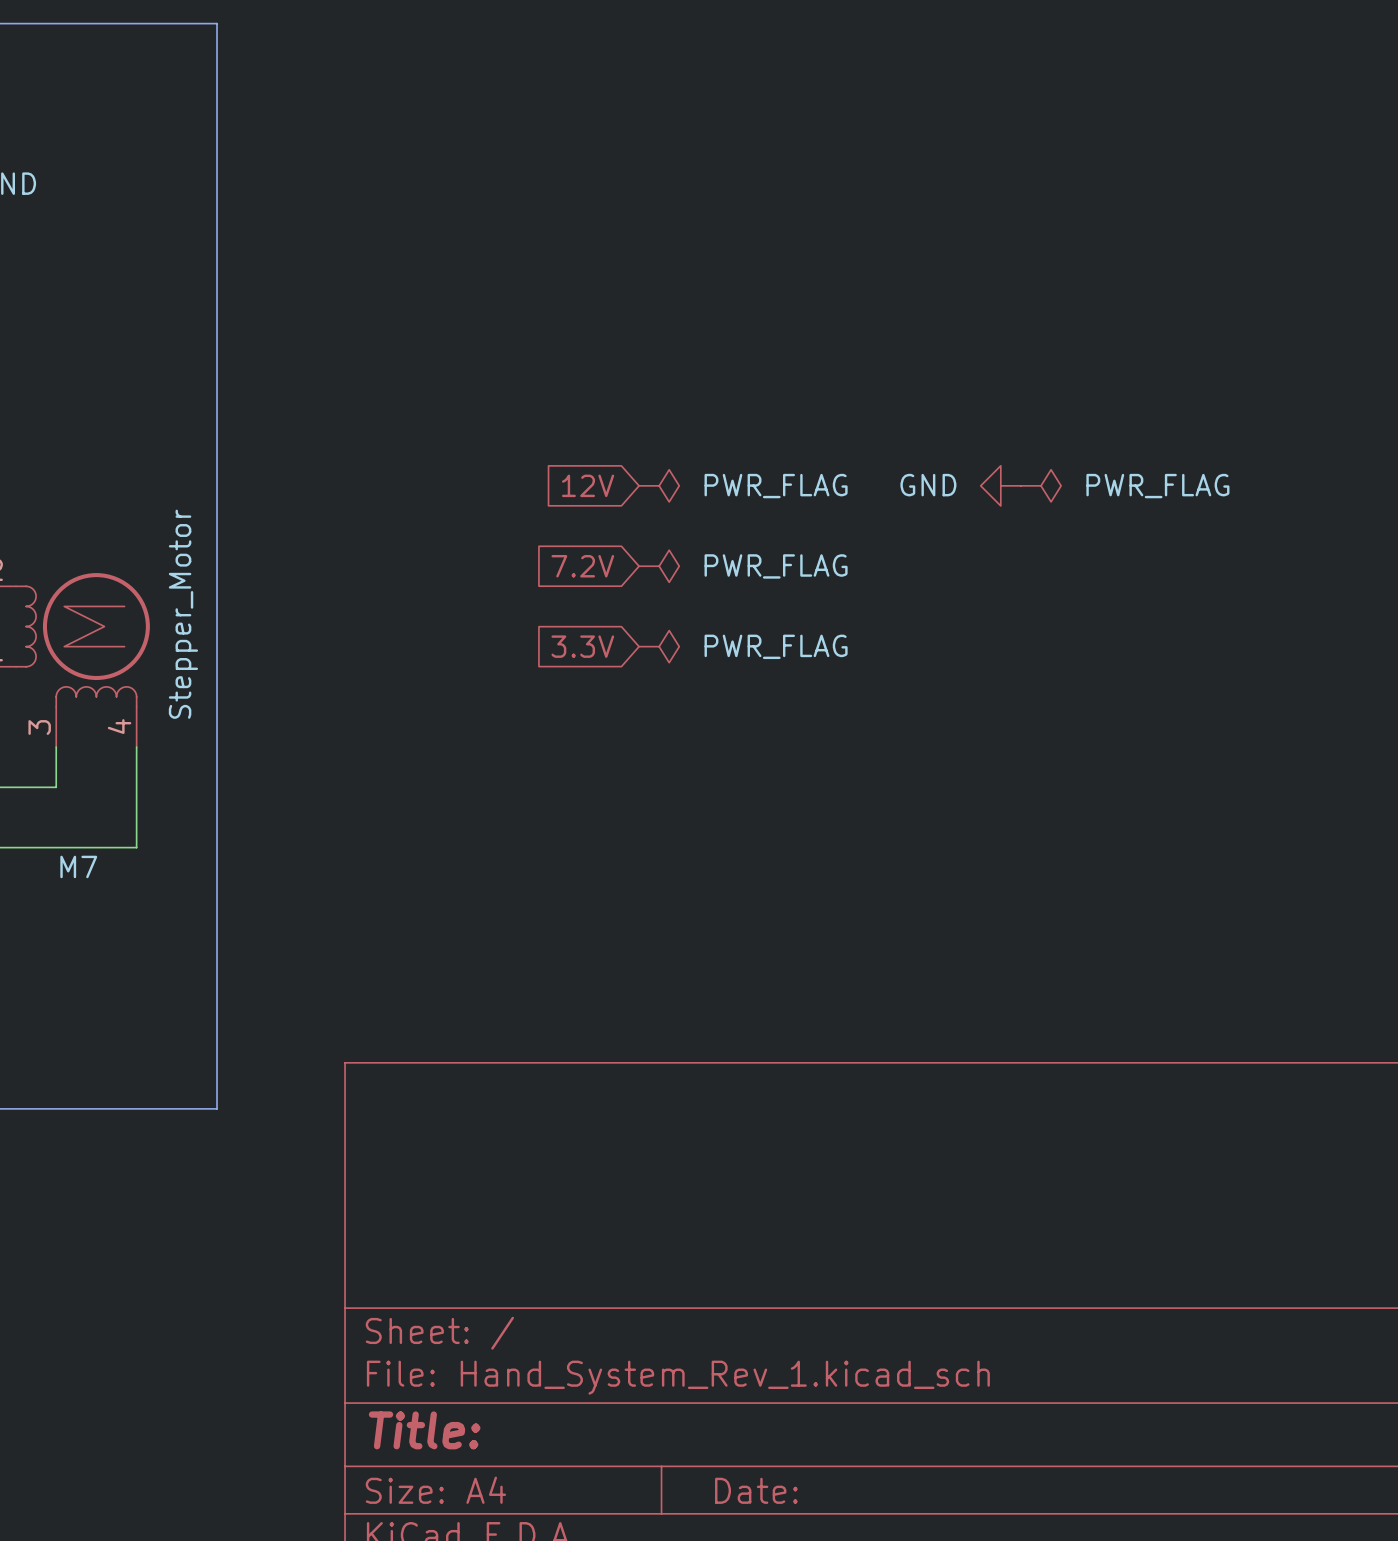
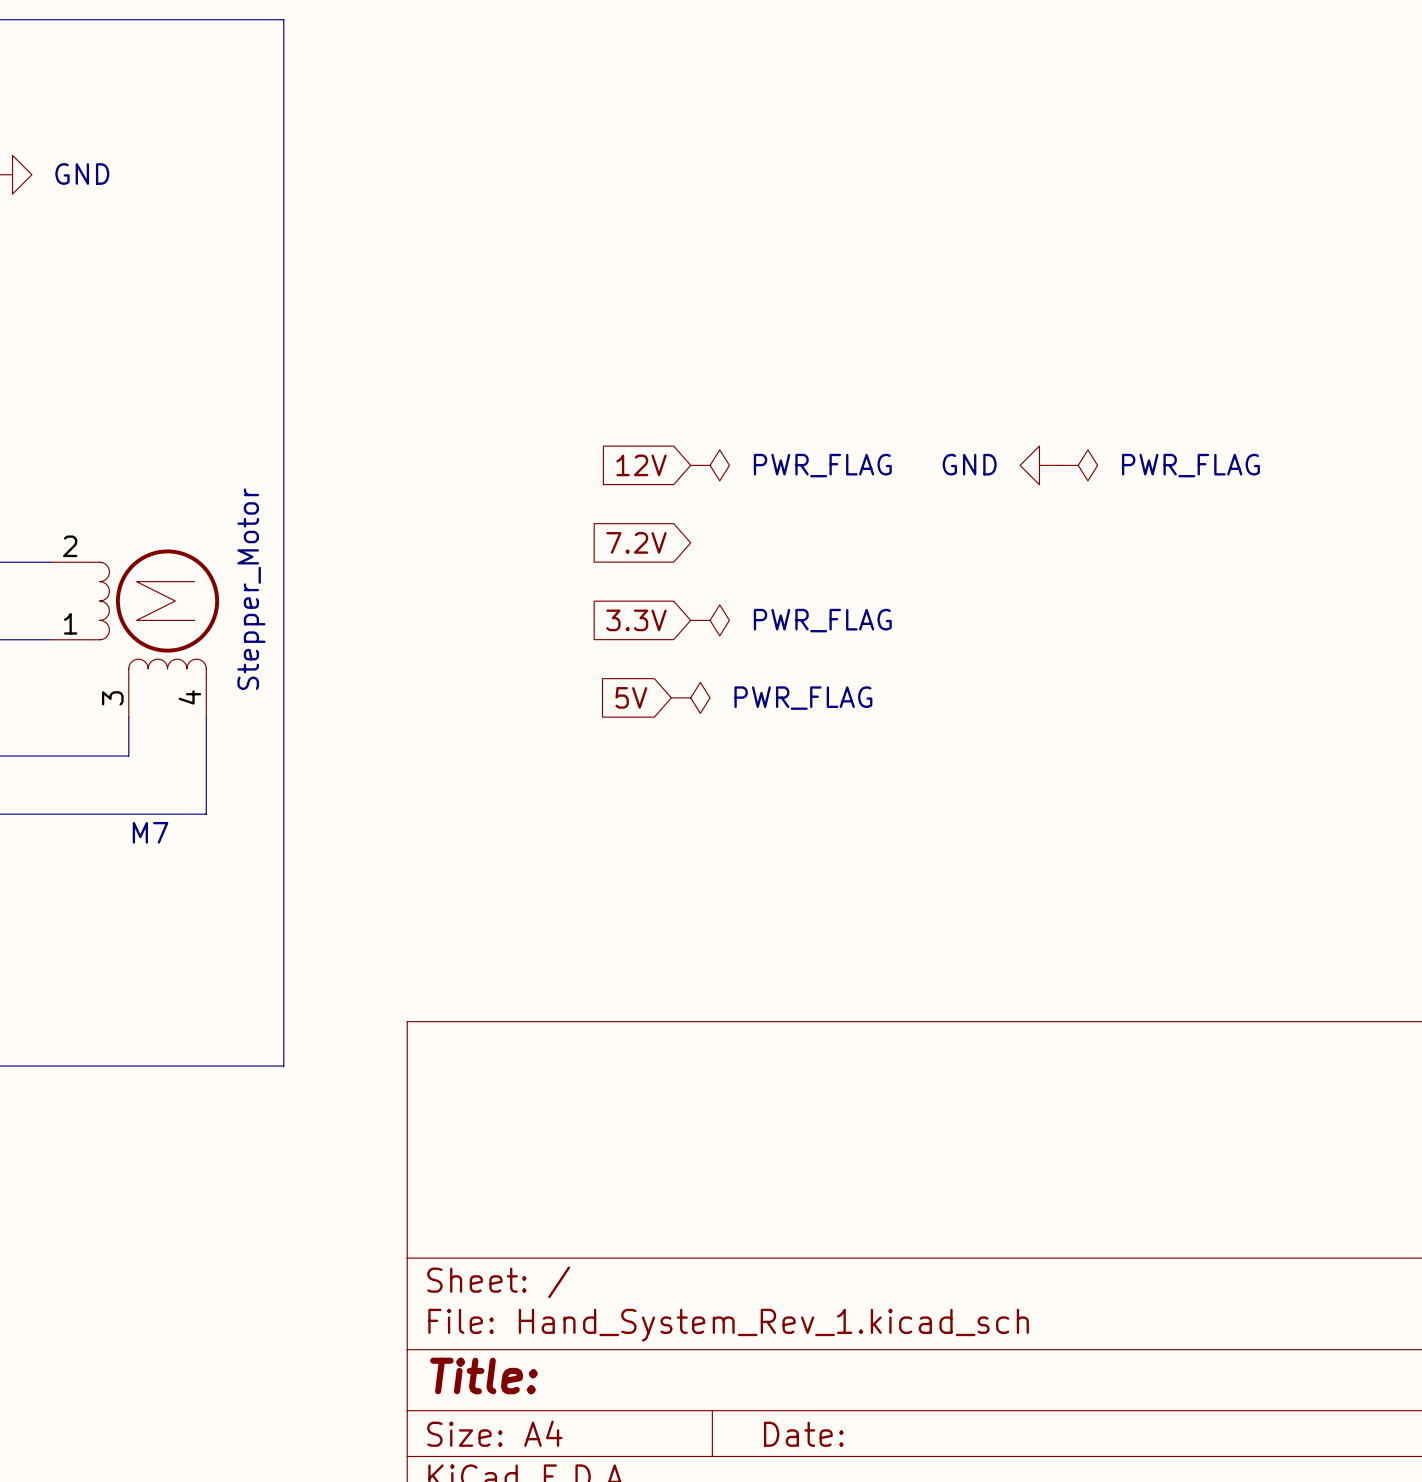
power symbol position: PWR_FLAG (659, 566) -> PWR_FLAG (690, 697)
global label: none -> 5V (631, 697)

